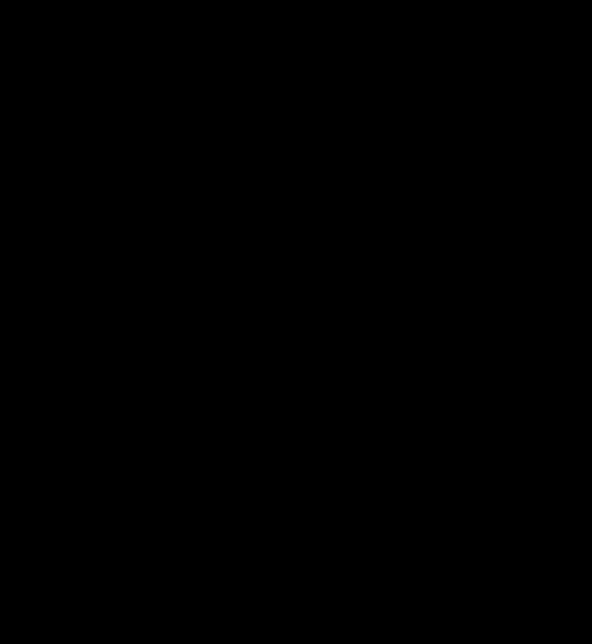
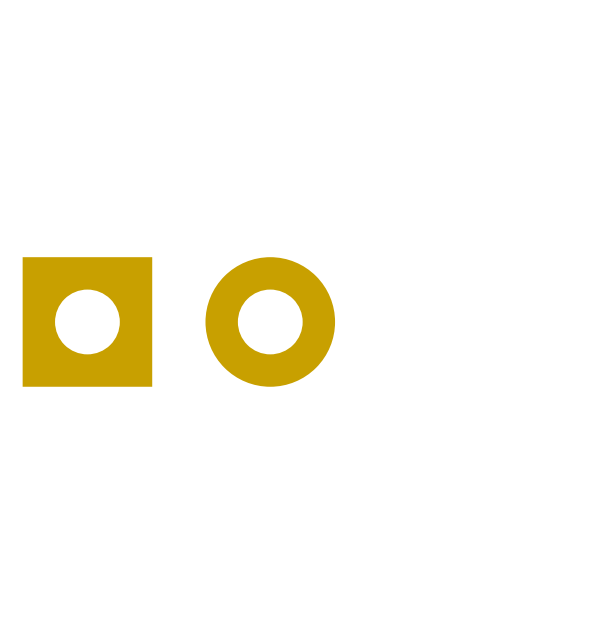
part: none -> (178, 321)

